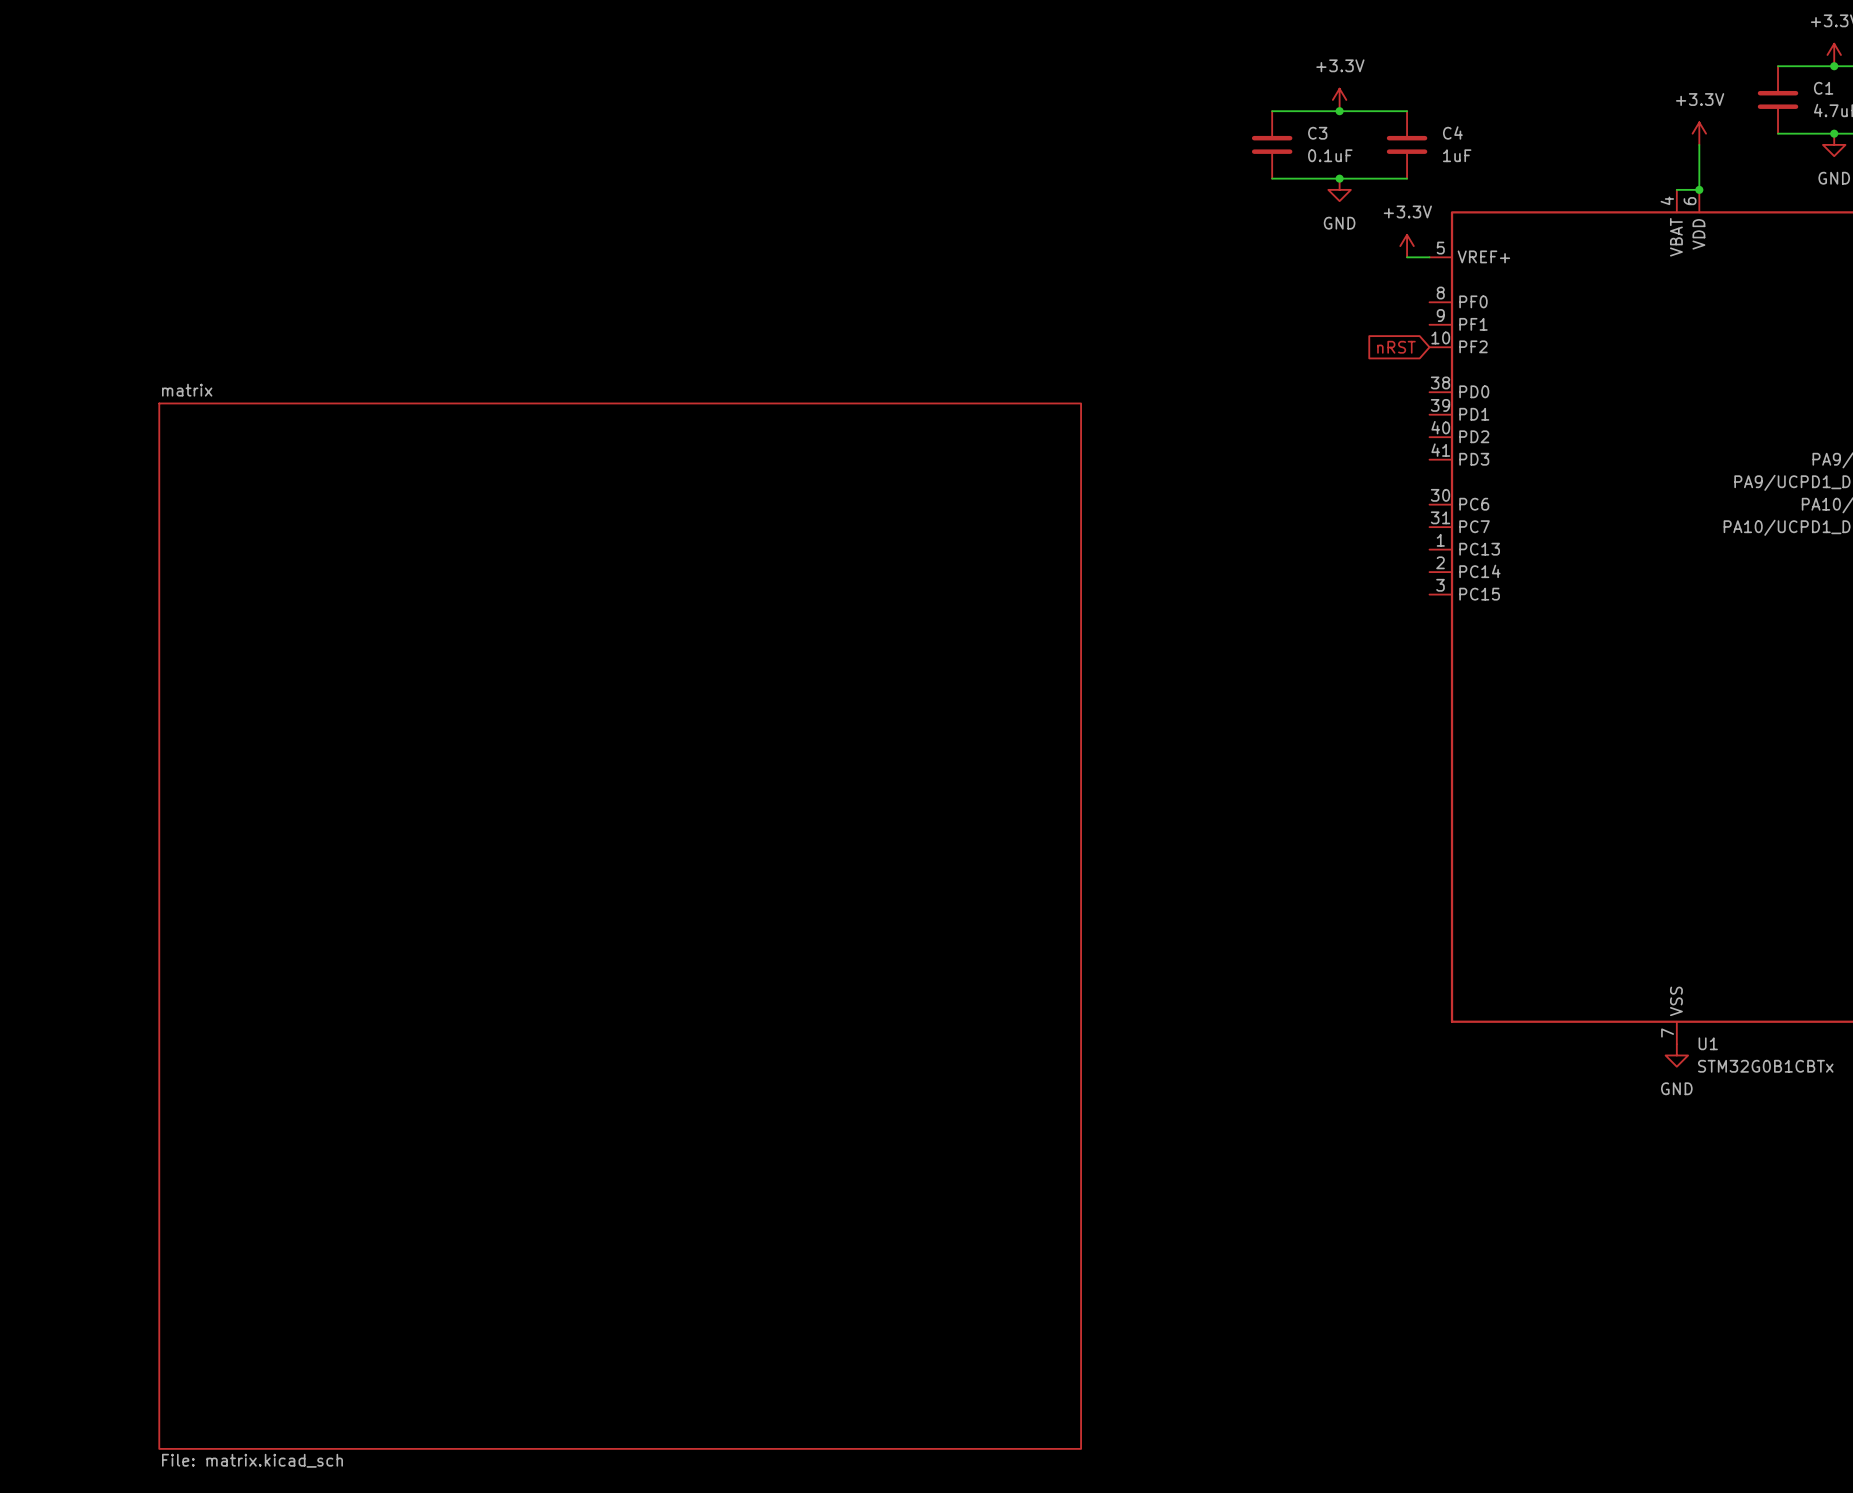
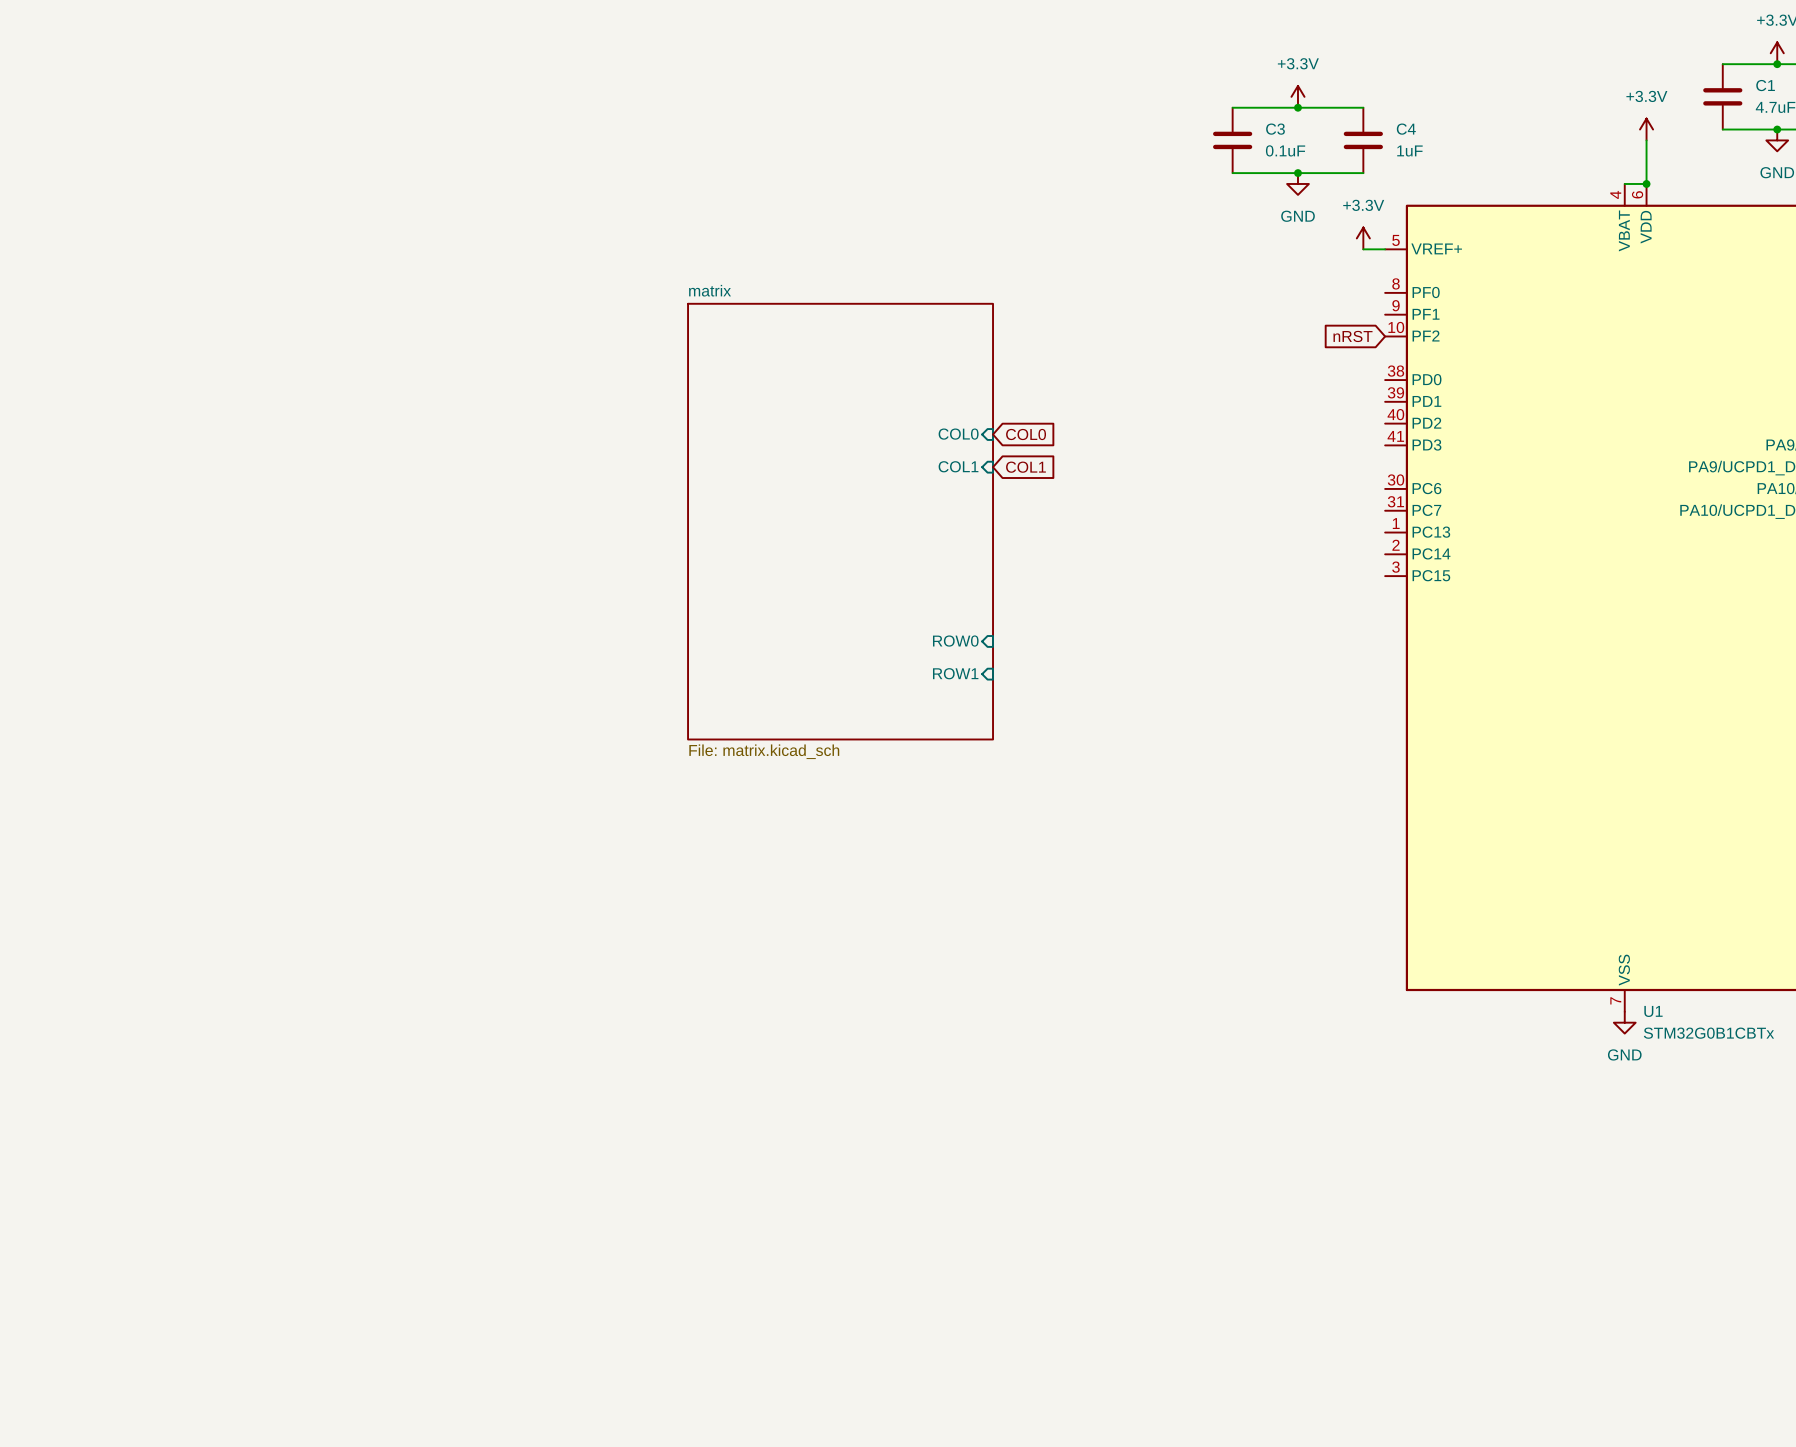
sheet pin: none -> COL0 (958, 434)
global label: none -> COL0 (1026, 434)
sheet pin: none -> COL1 (958, 466)
global label: none -> COL1 (1025, 467)
sheet matrix: none -> File: matrix.kicad_sch (840, 521)
sheet pin: none -> ROW0 (955, 641)
sheet pin: none -> ROW1 (955, 673)
sheet matrix: File: matrix.kicad_sch (620, 926) -> none

